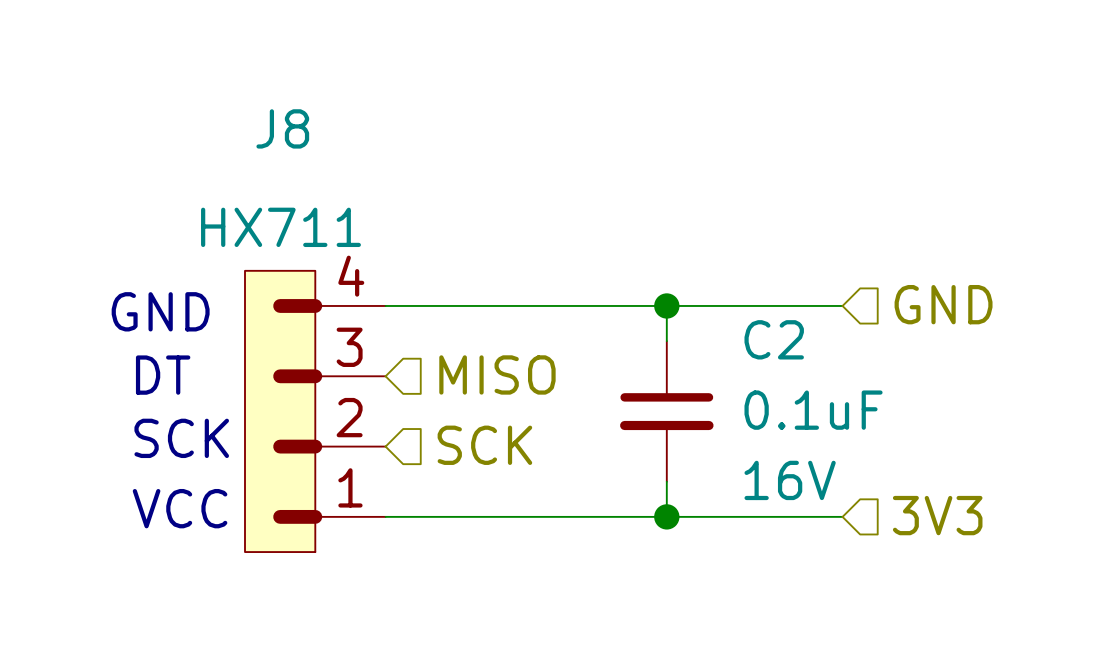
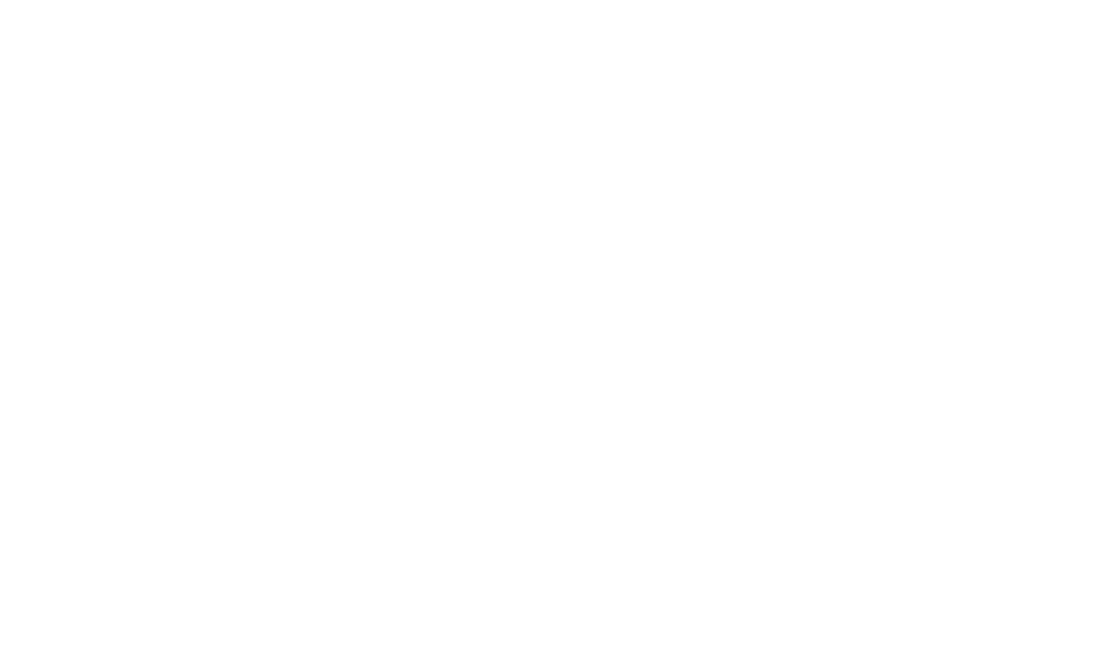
hierarchical label: GND (943, 304) -> none
wire: (385, 305) (842, 305) -> none
wire: (666, 305) (666, 341) -> none
junction: (666, 305) -> none
text: GND (160, 311) -> none
hierarchical label: MISO (497, 374) -> none
text: DT (163, 375) -> none
J8: HX711 (315, 411) -> none
C2: 0.1uF (666, 411) -> none
text: SCK (181, 438) -> none
hierarchical label: SCK (484, 445) -> none
wire: (666, 481) (666, 516) -> none
text: VCC (180, 508) -> none
hierarchical label: 3V3 (937, 515) -> none
wire: (385, 516) (842, 516) -> none
junction: (666, 516) -> none

